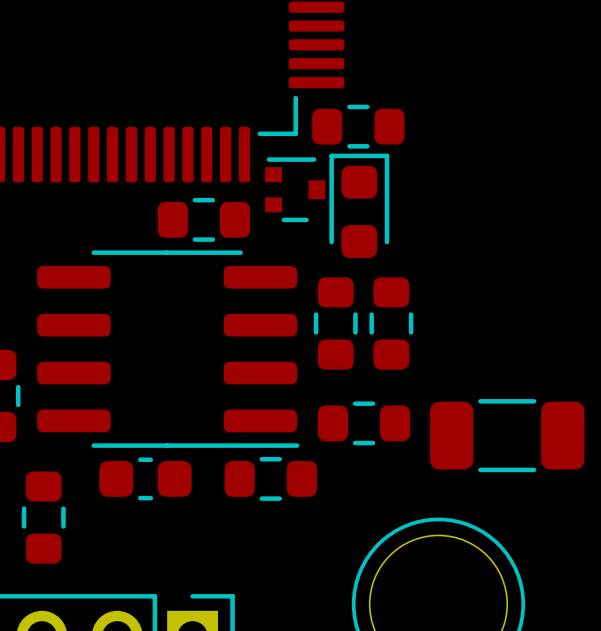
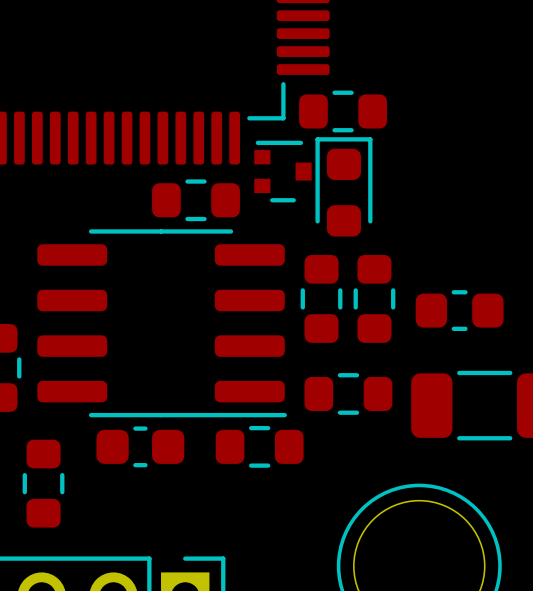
part: none -> (459, 310)

